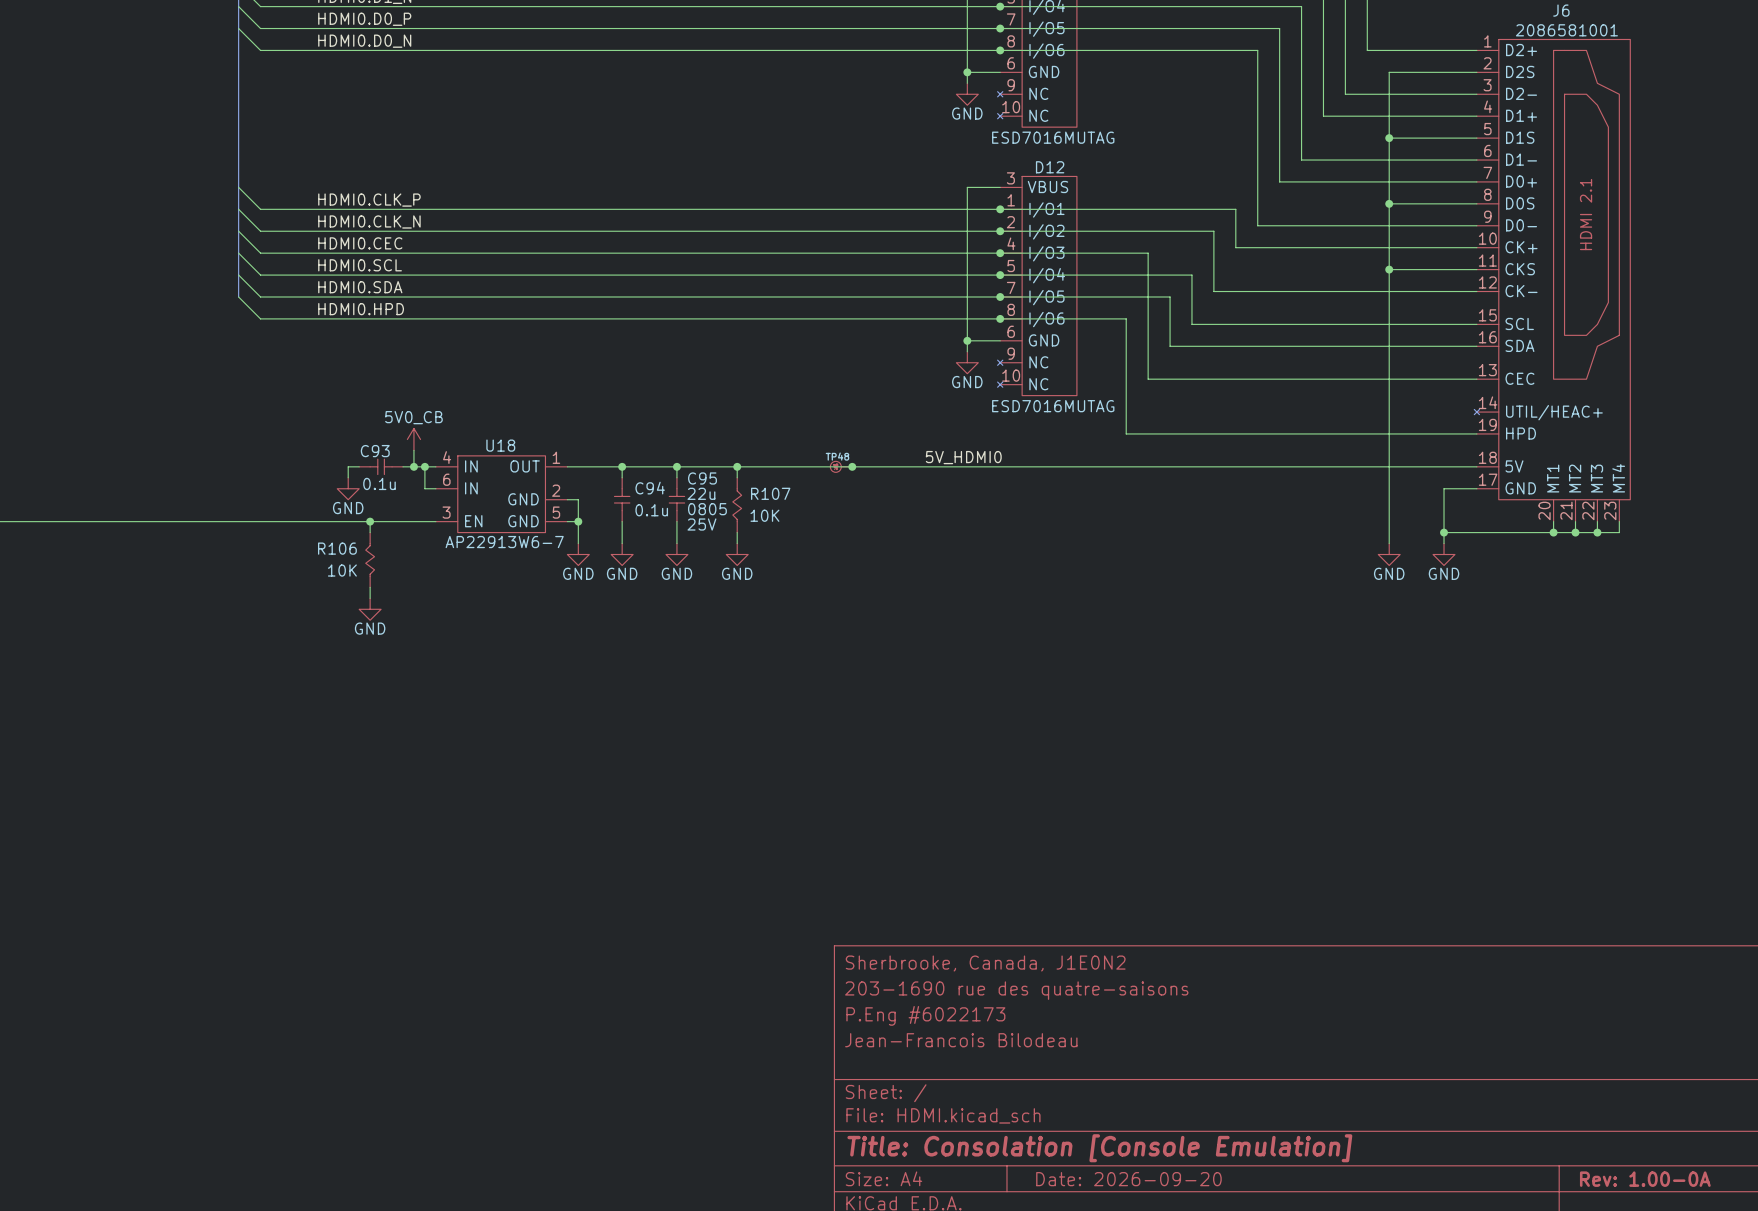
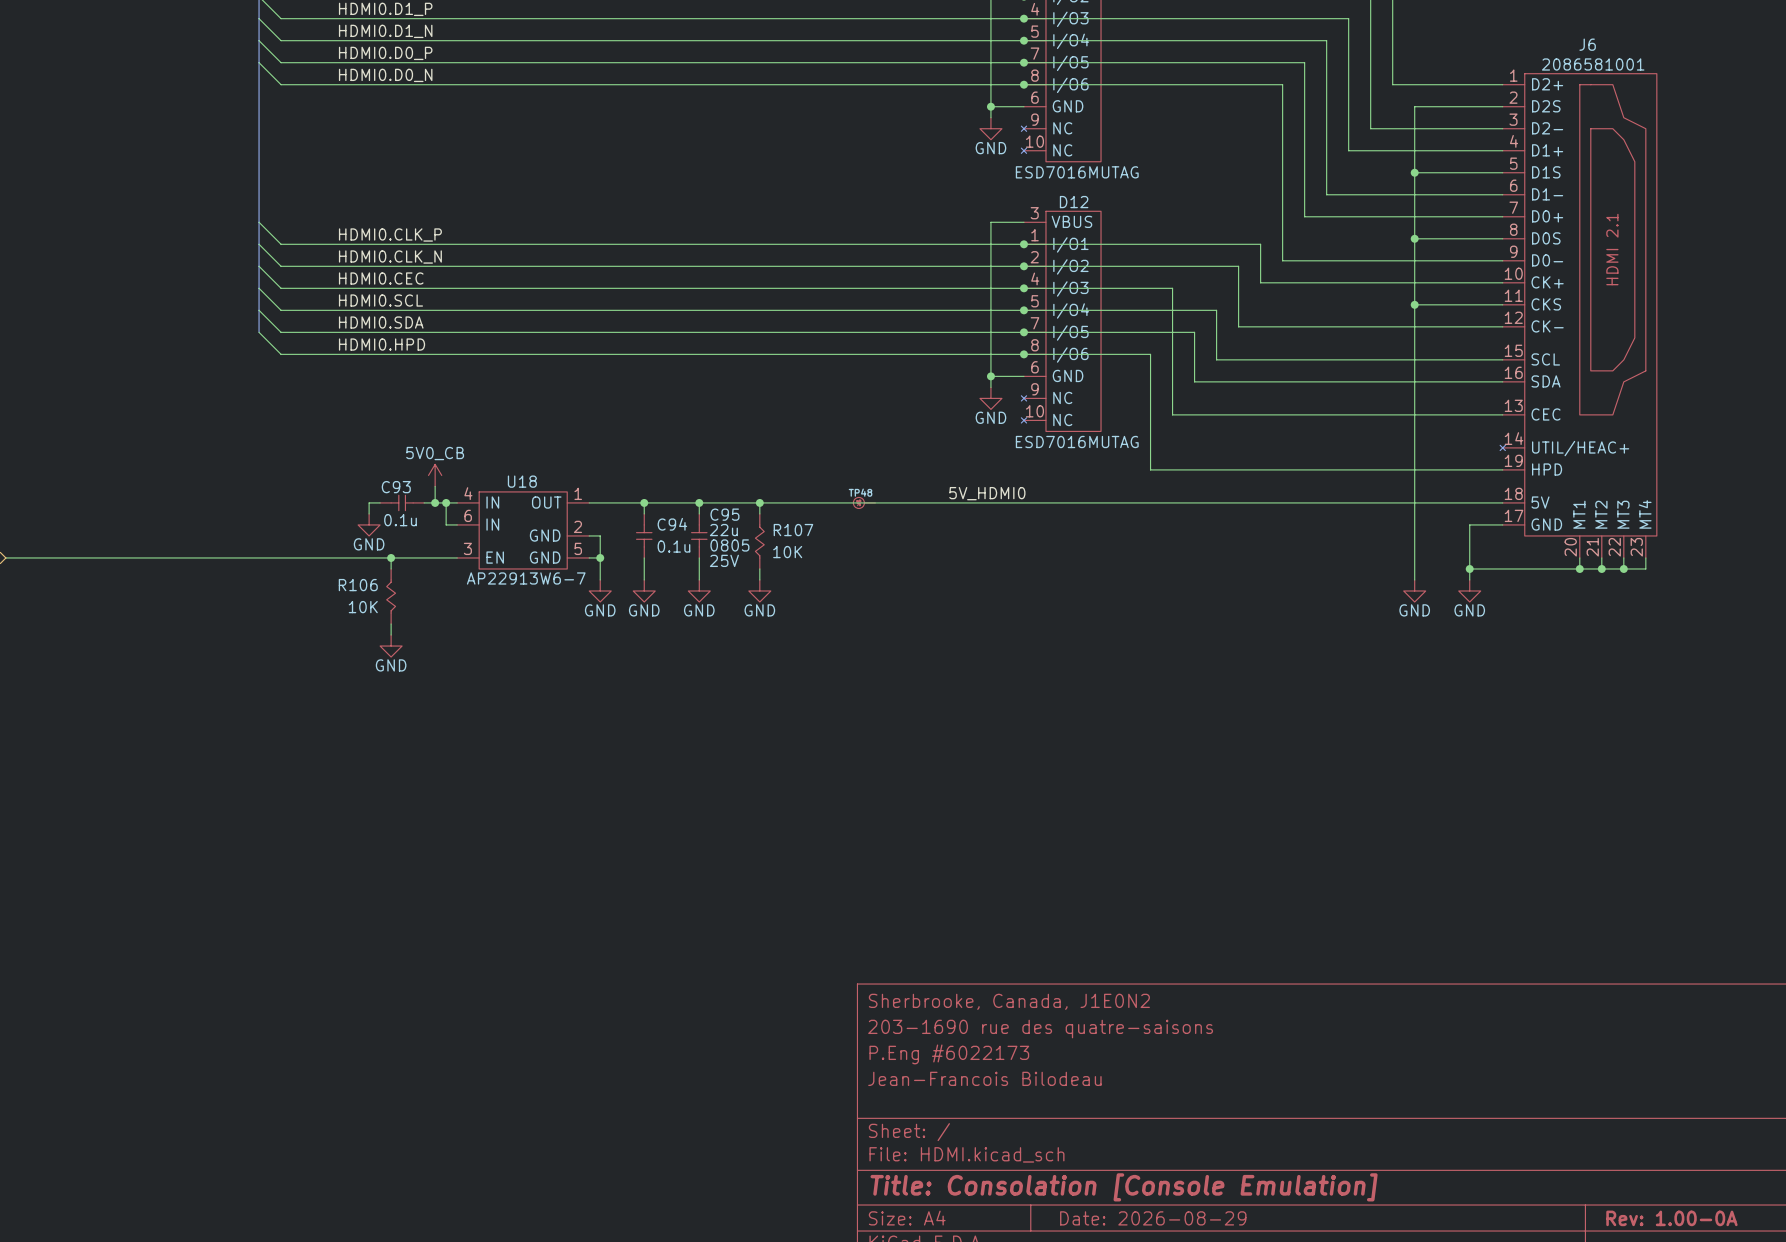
junction: (852, 466) -> none
title block: Date: 2026-09-20 (1128, 1179) -> Date: 2026-08-29 (1153, 1218)

